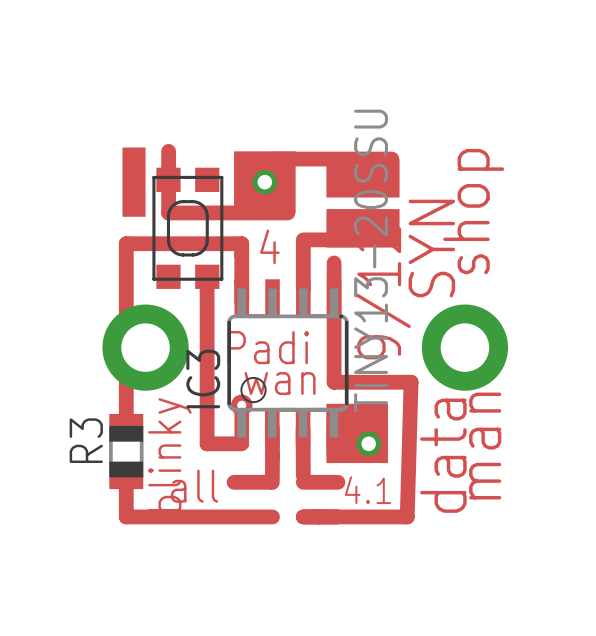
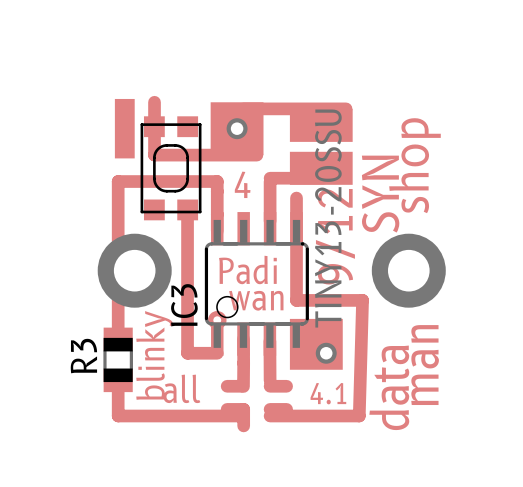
text position: data (443, 455) -> data (389, 387)
track: (234, 482) (253, 482) -> (270, 409) (286, 409)
track: (322, 482) (337, 482) -> none
track: none -> (227, 409) (243, 409) (243, 425)

